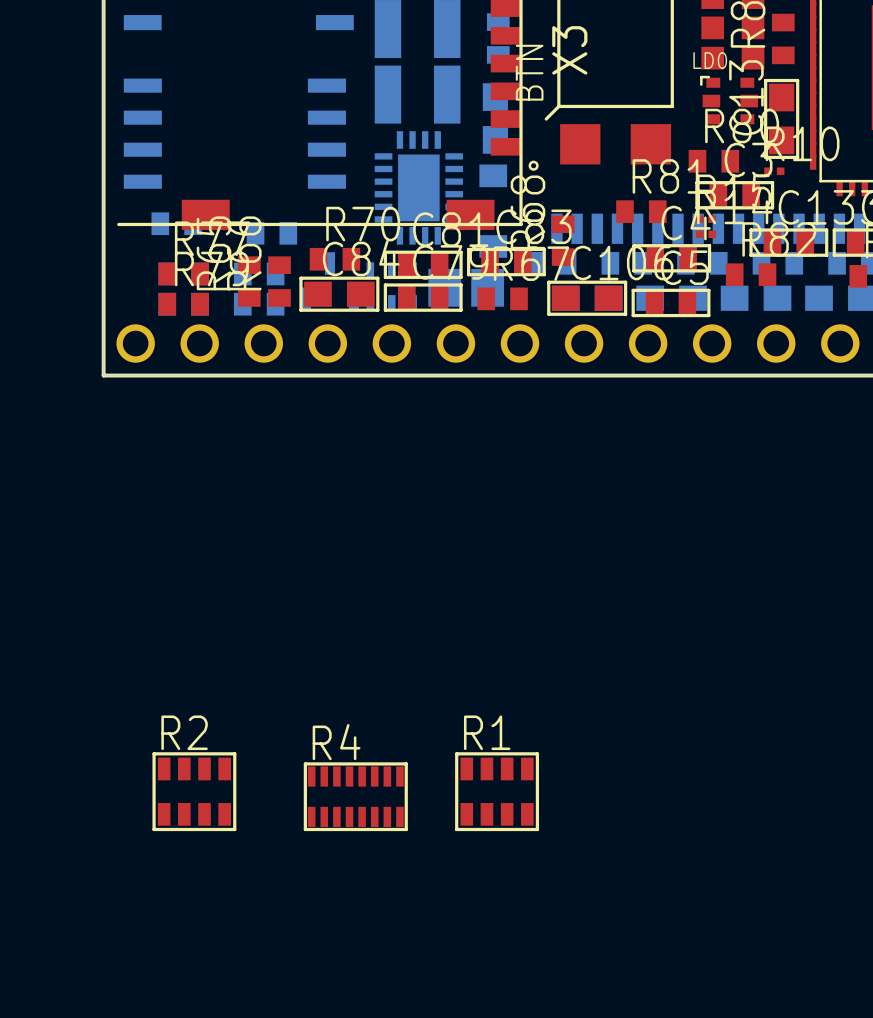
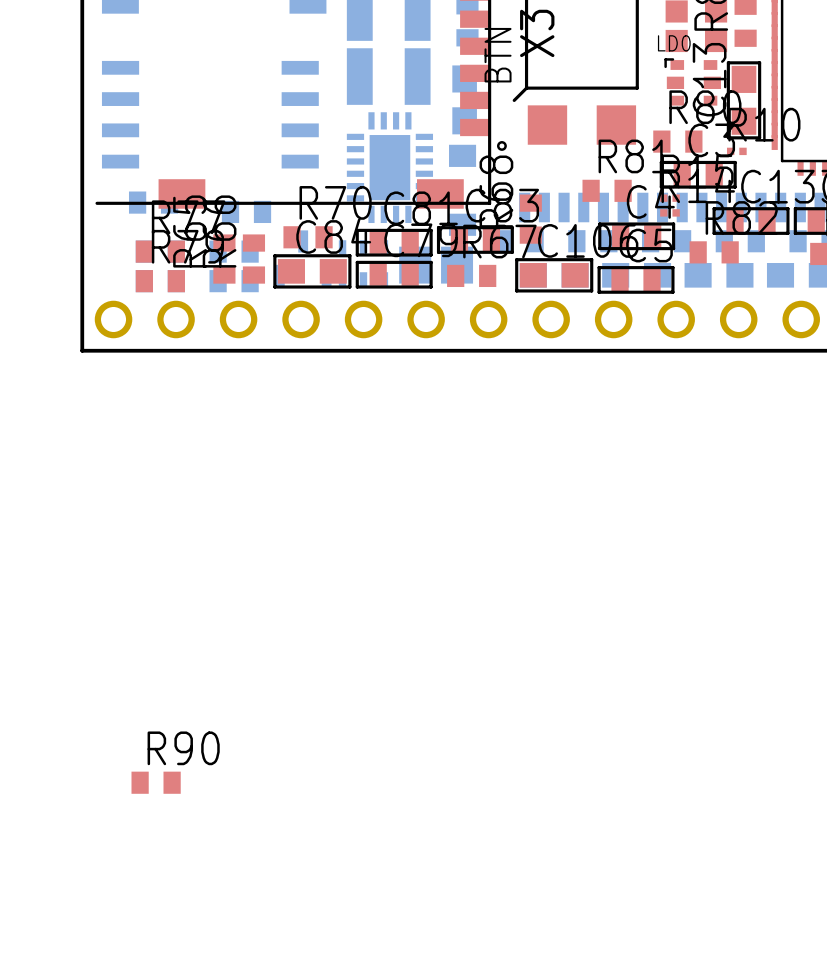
R2: (194, 791) -> none
R1: (497, 791) -> none
R4: (355, 796) -> none
R90: none -> (156, 782)

